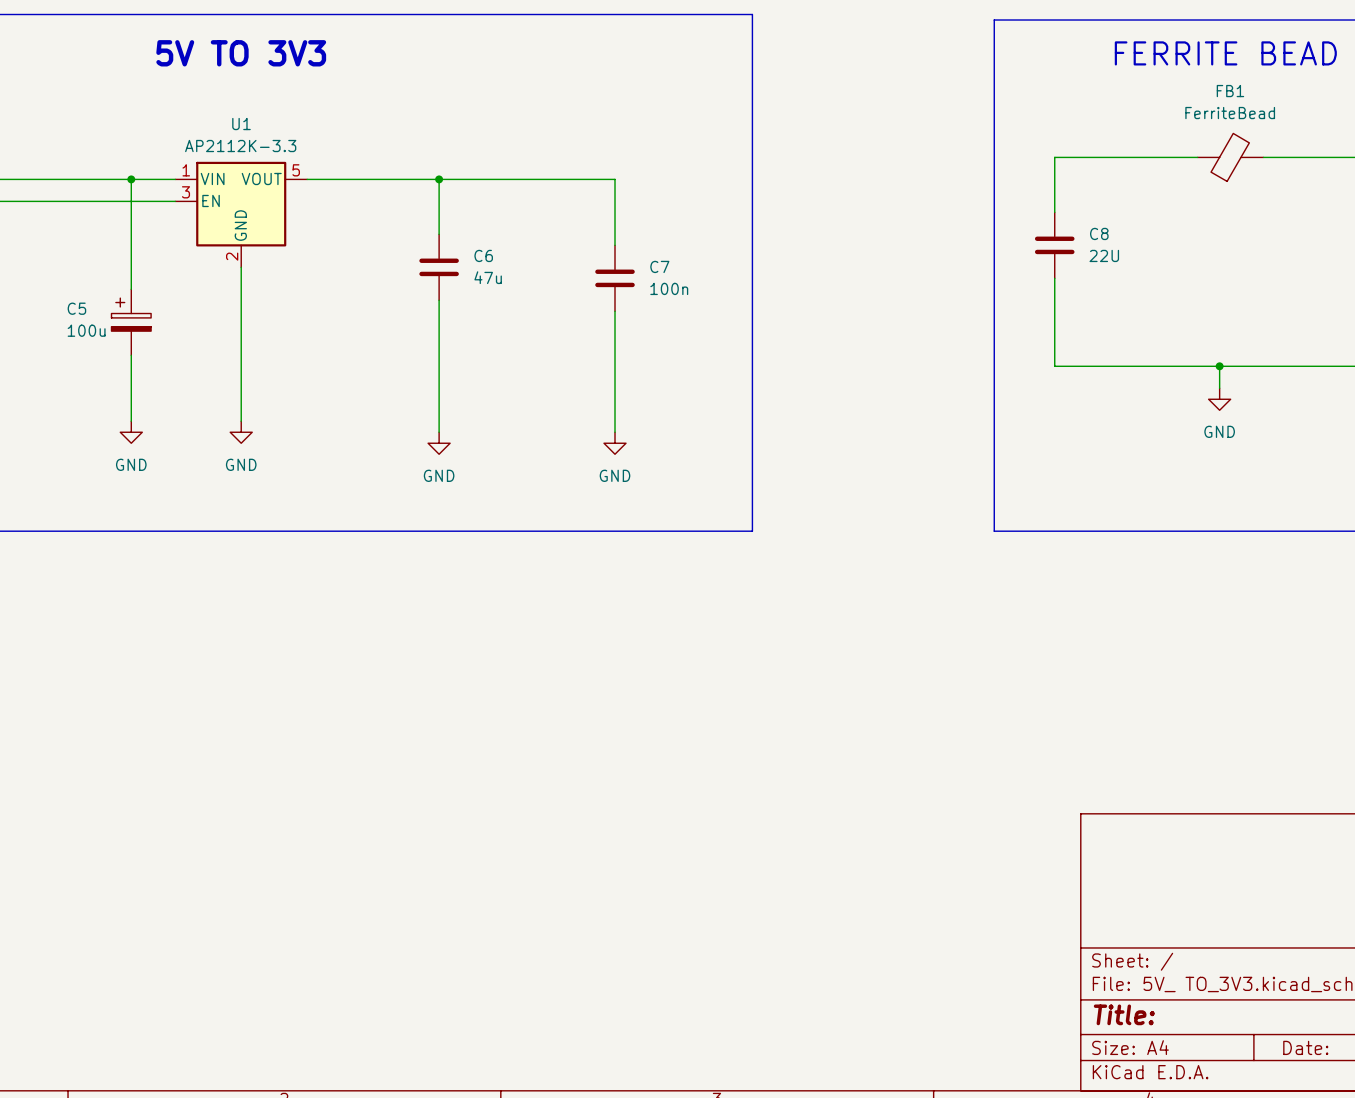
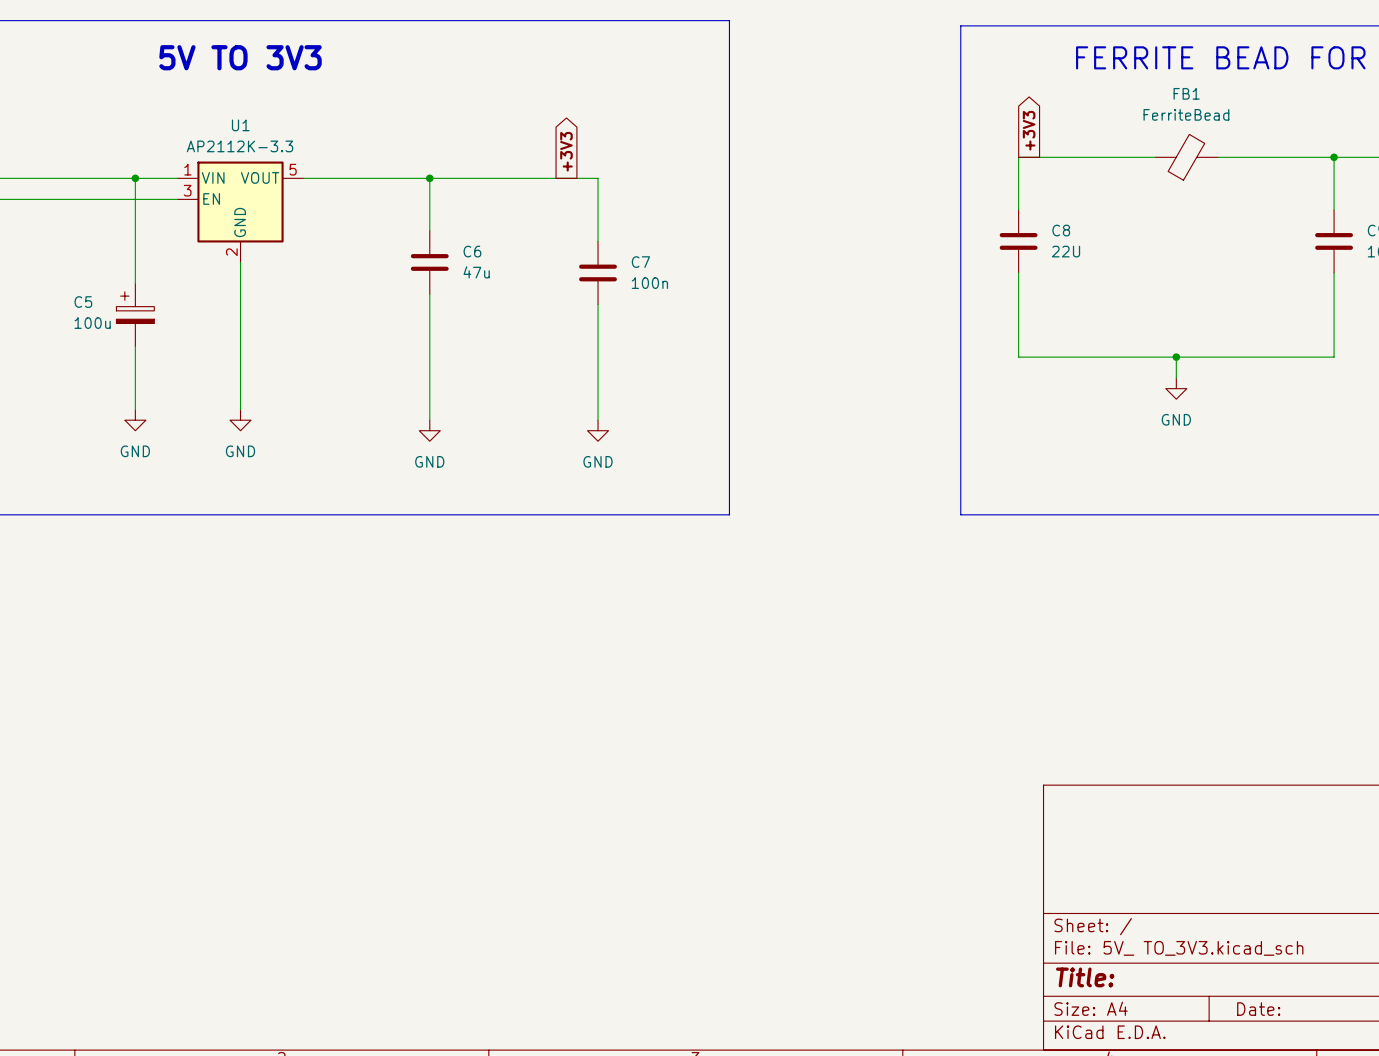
global label: none -> +3V3 (1029, 130)
global label: none -> +3V3 (566, 151)

